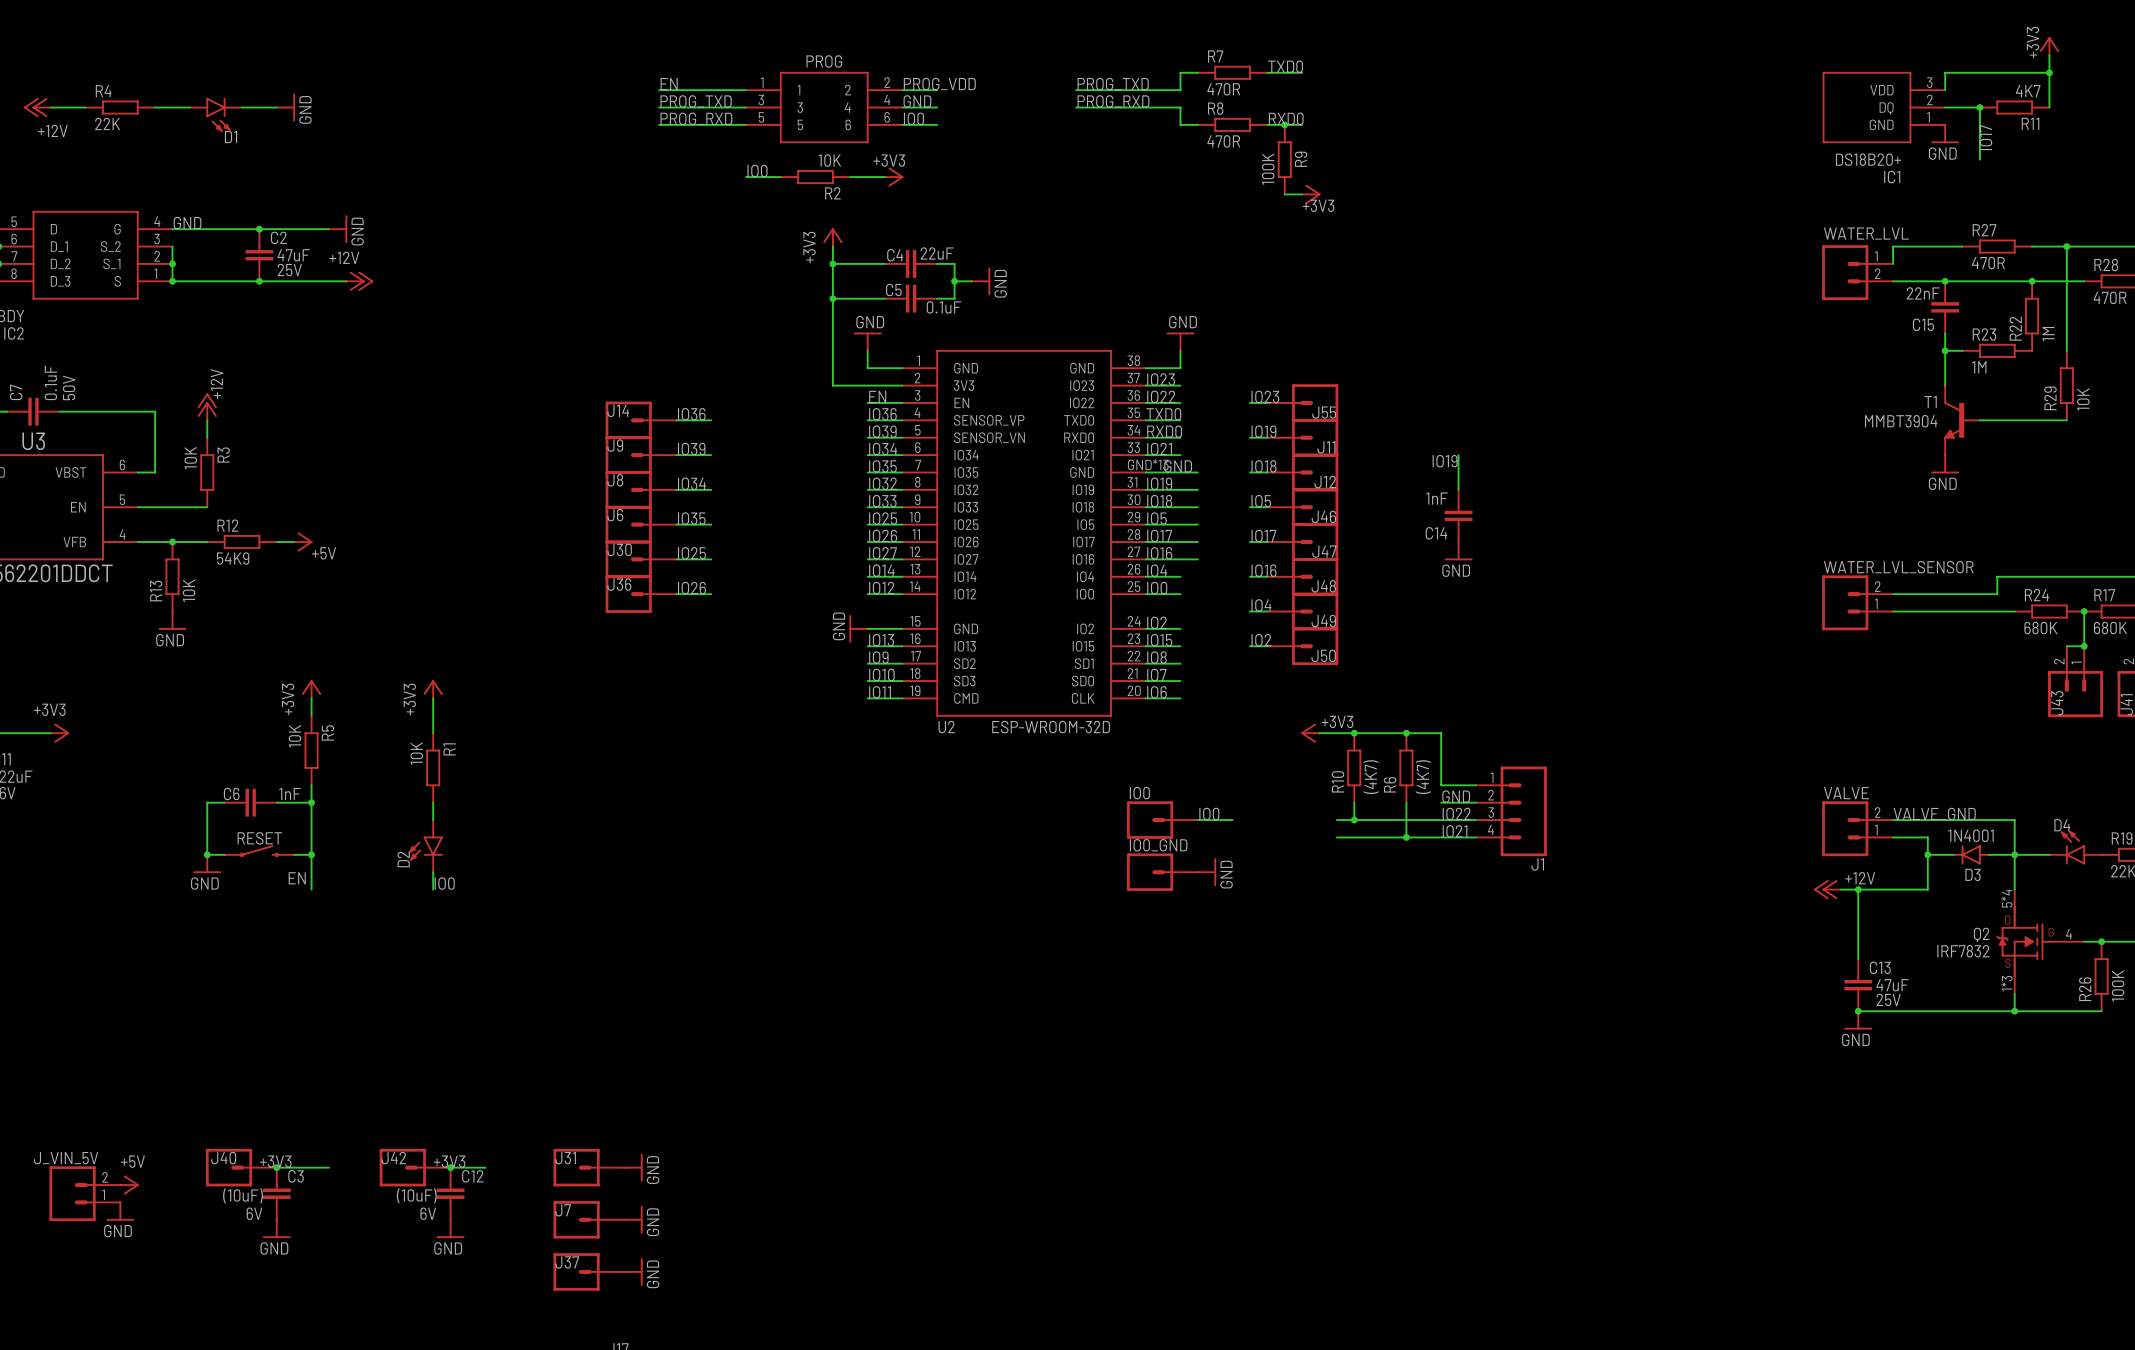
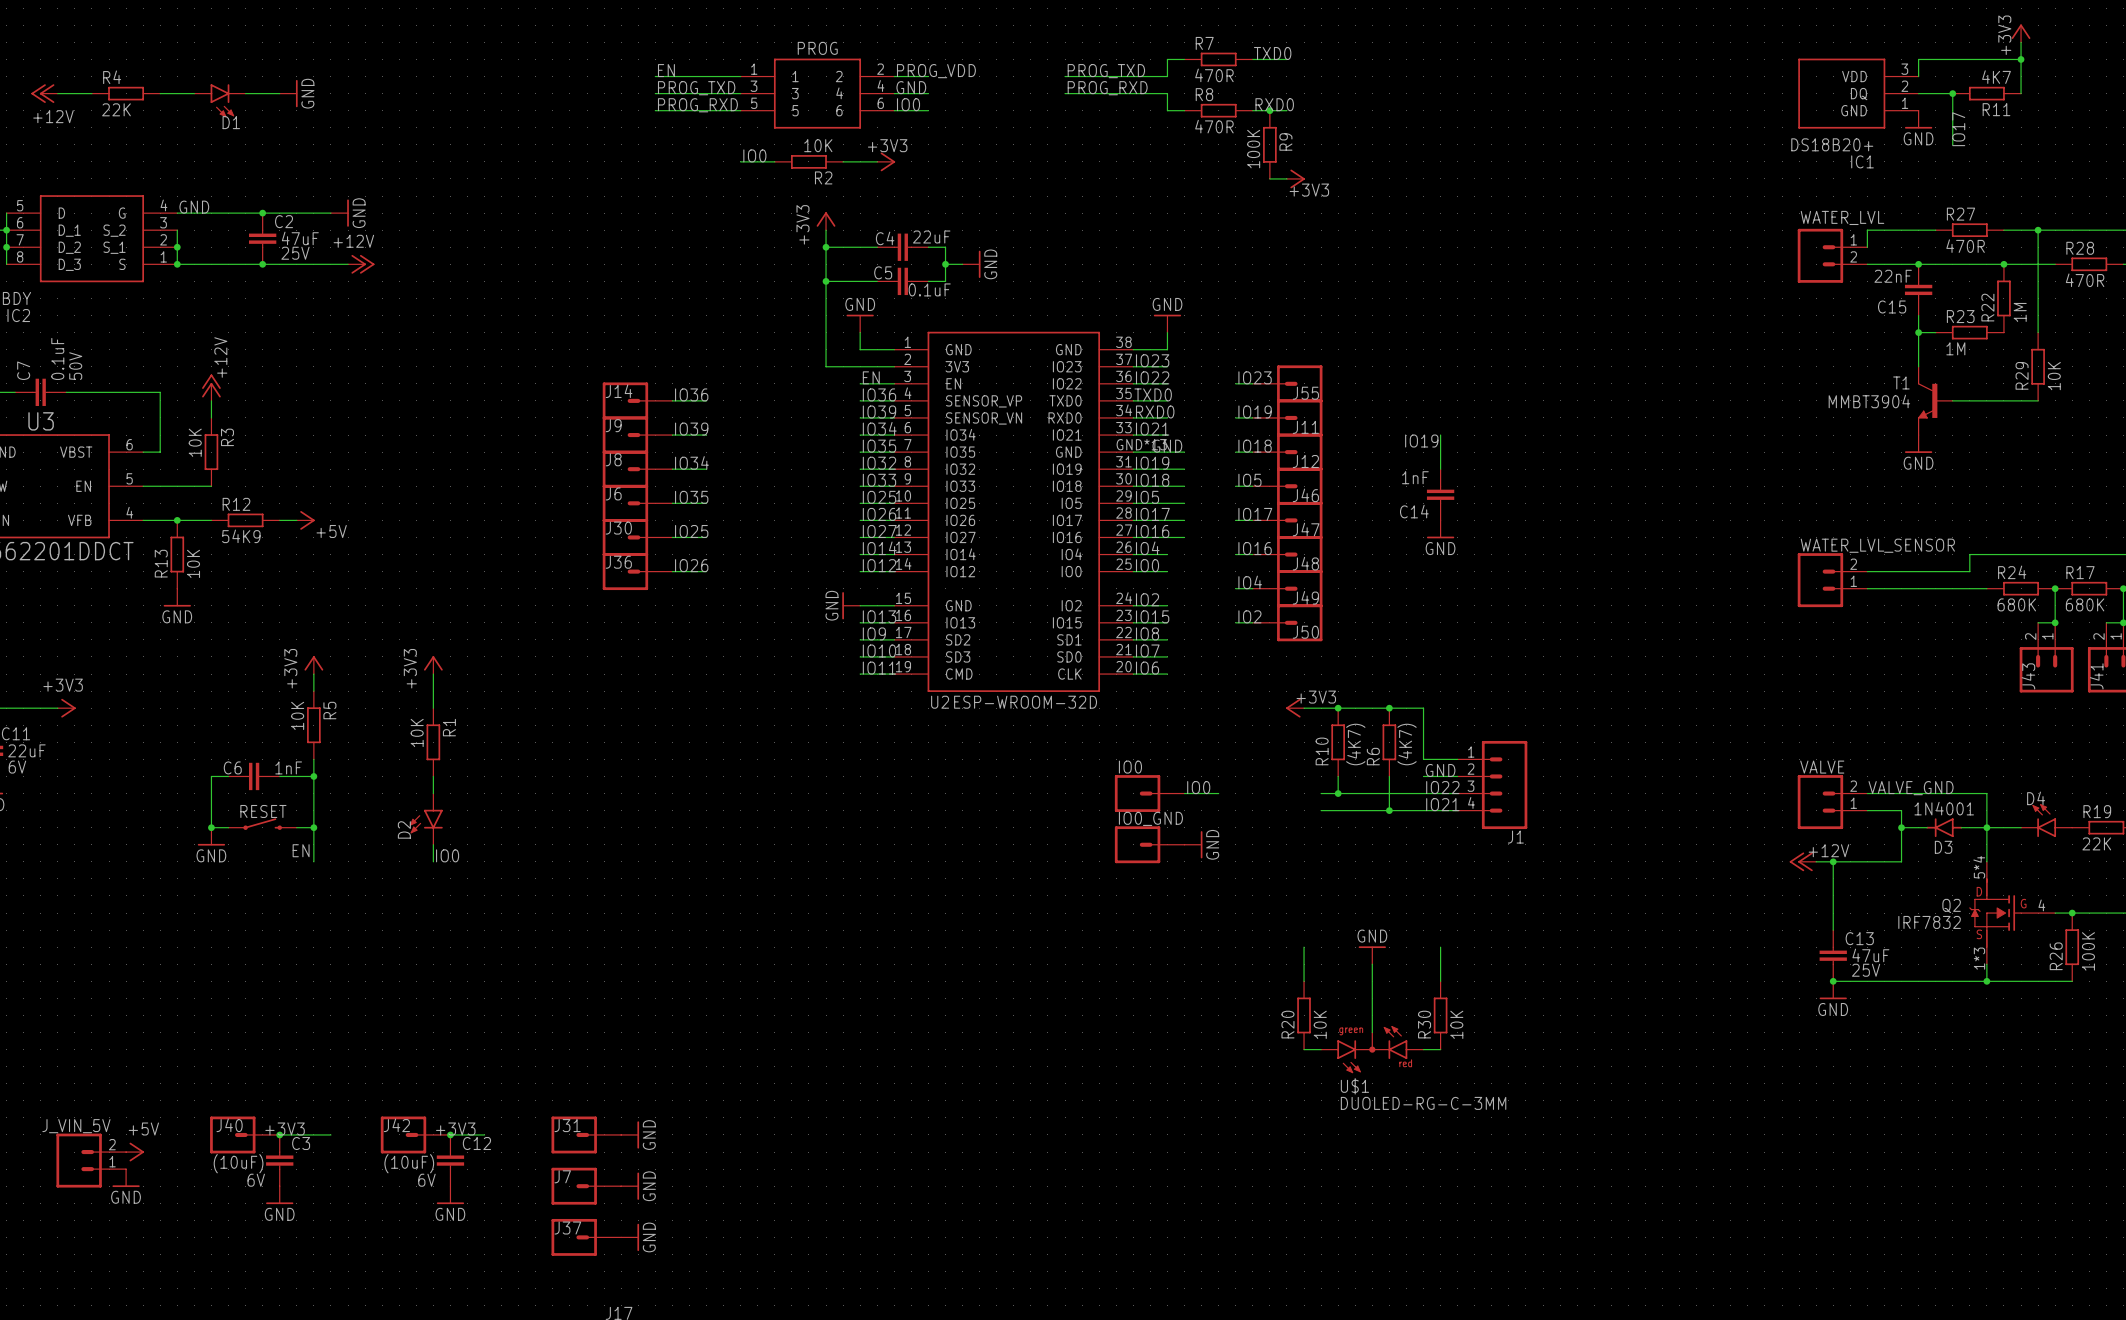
wire: none -> (1304, 947) (1304, 981)
wire: none -> (1440, 947) (1440, 981)
power symbol: none -> GND (1372, 955)
wire: none -> (1372, 964) (1372, 1032)
R20: none -> 10K (1304, 1015)
R30: none -> 10K (1440, 1015)
wire: none -> (1304, 1049) (1321, 1049)
U$1: none -> DUOLED-RG-C-3MM (1372, 1049)
wire: none -> (1423, 1049) (1440, 1049)

